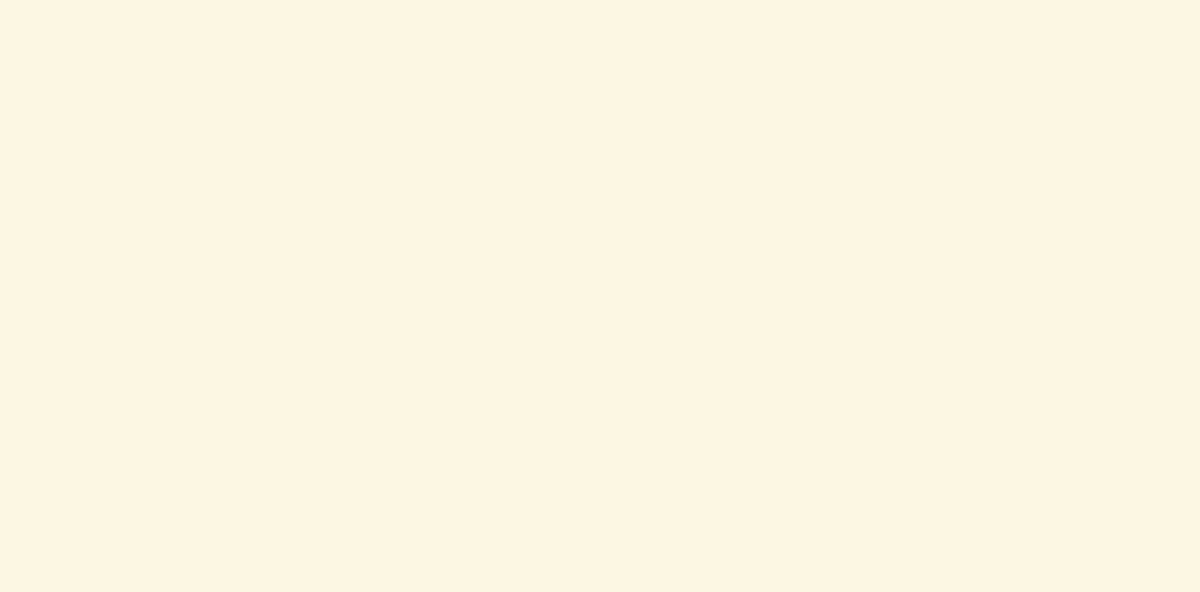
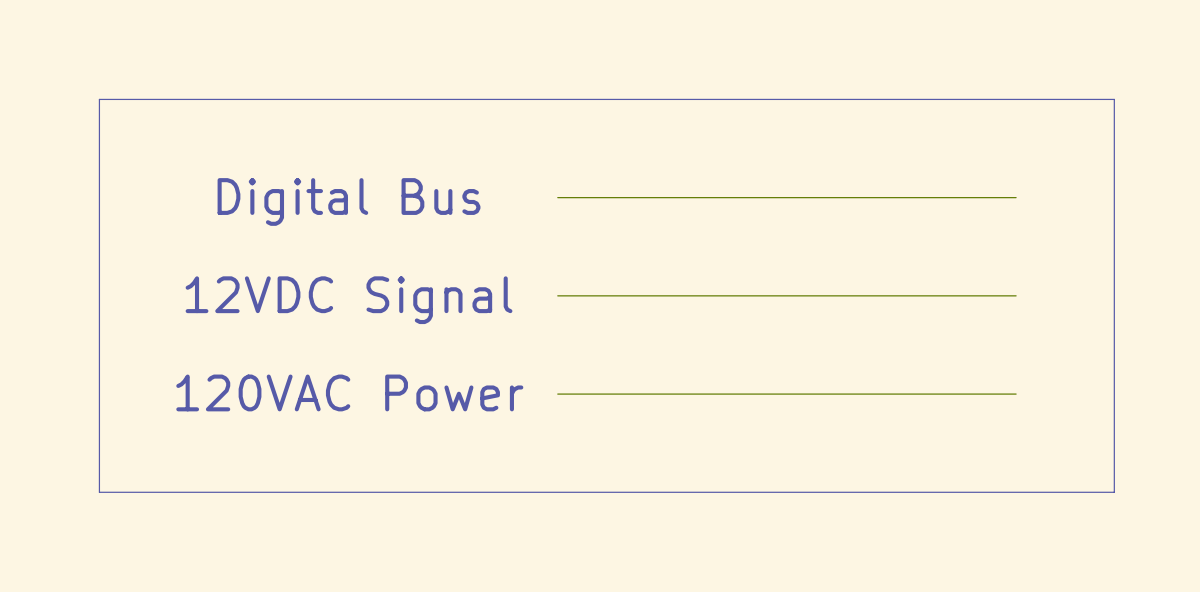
line: none -> (99, 99) (1114, 99) (1114, 492) (99, 492) (99, 99)
wire: none -> (557, 197) (1016, 197)
text: none -> Digital Bus (349, 201)
wire: none -> (557, 295) (1016, 295)
text: none -> 12VDC Signal (349, 300)
text: none -> 120VAC Power (349, 392)
wire: none -> (557, 394) (1016, 394)

